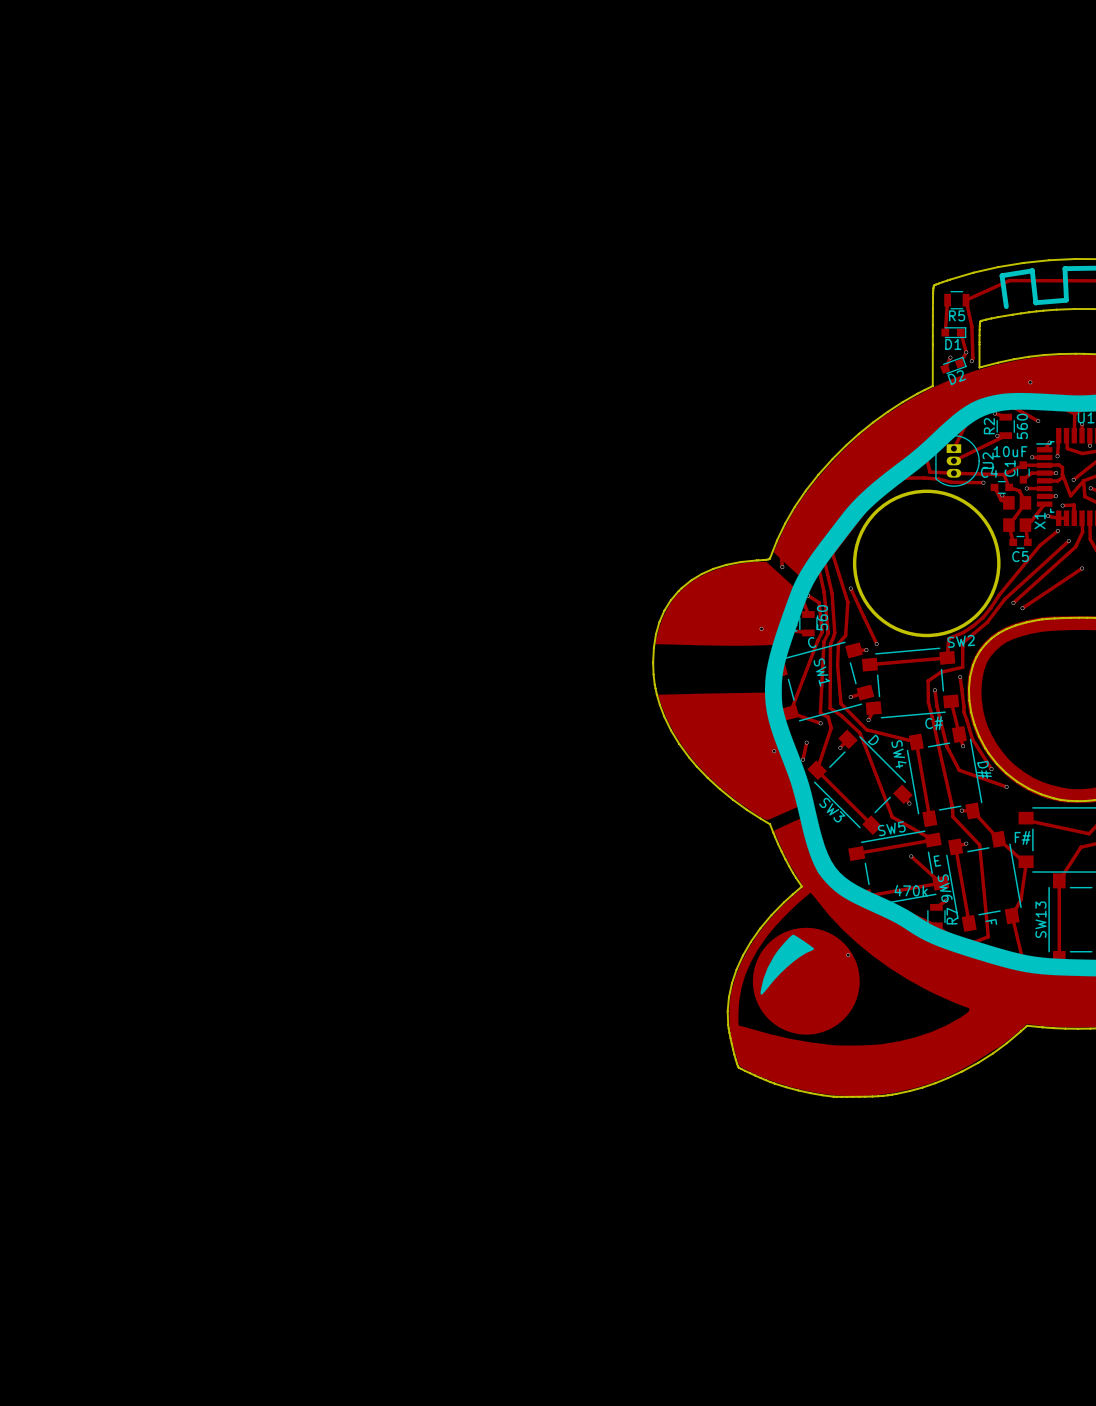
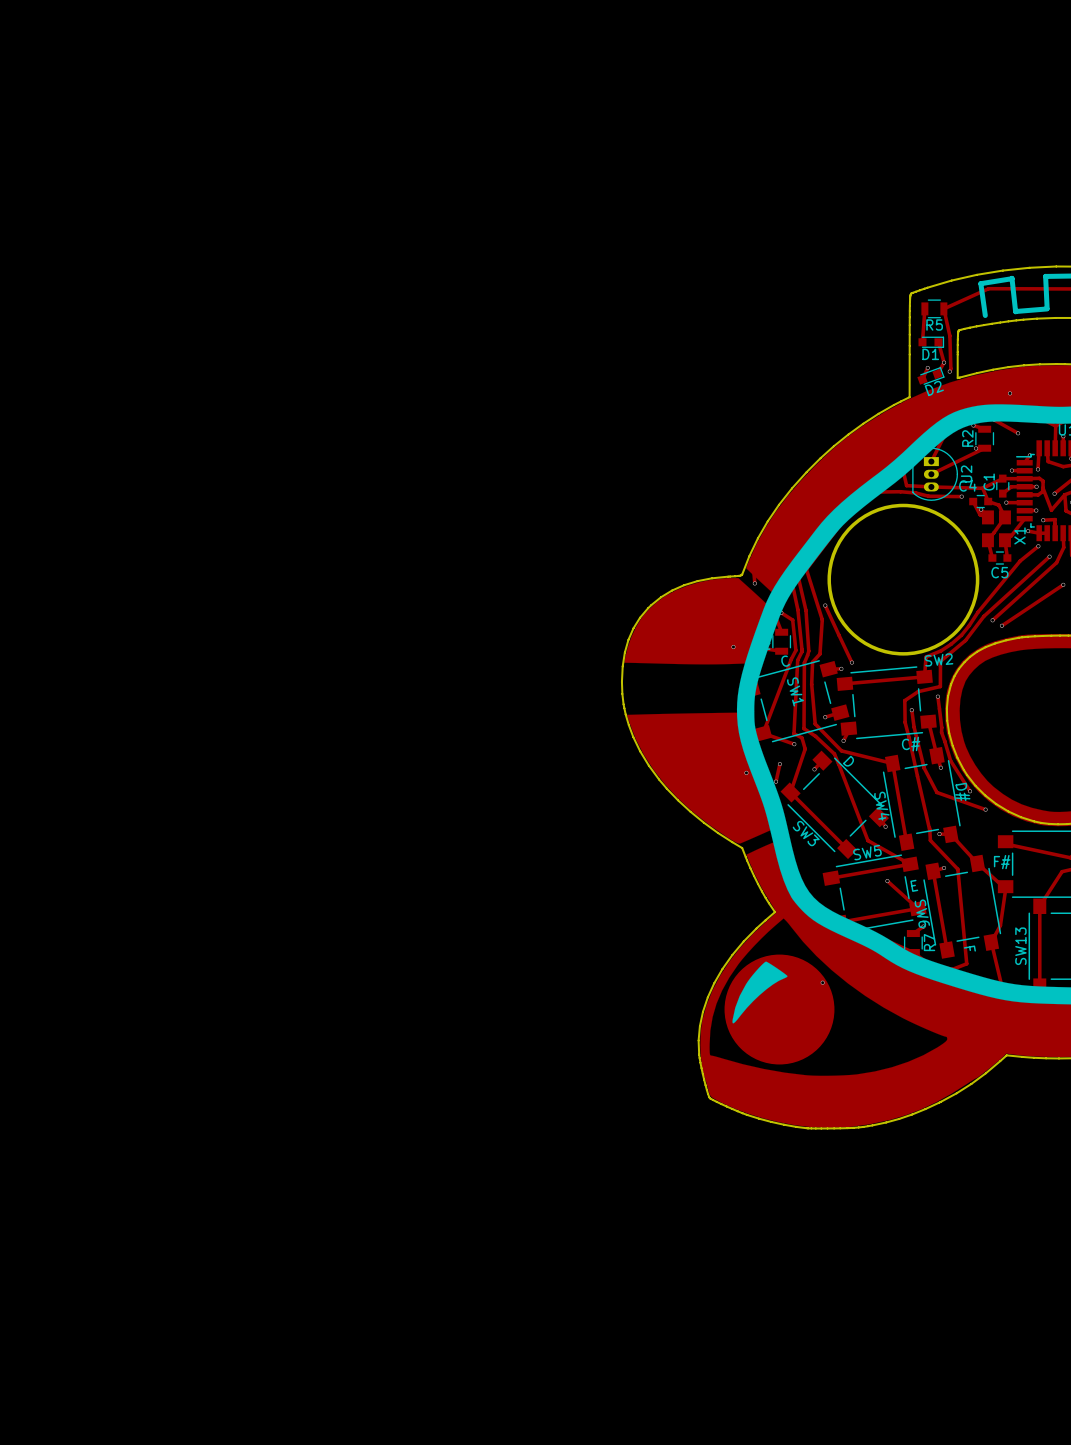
R2 value: 560 (1022, 426) -> none
C1 value: 10uF (1010, 451) -> none
part value: 560 (822, 617) -> none
SW4 name position: SW4 (898, 754) -> SW4 (881, 806)
R7 value: 470k (911, 890) -> none

